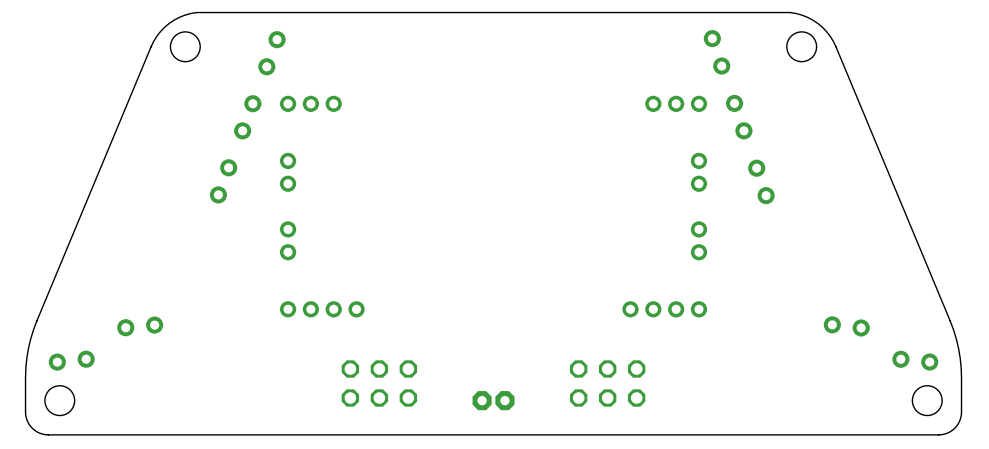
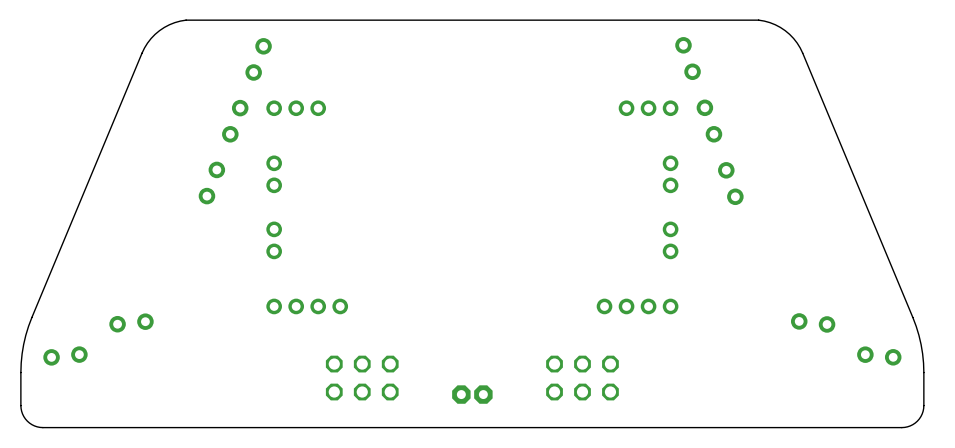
round board edge: [170, 31, 201, 63] -> none
round board edge: [786, 31, 818, 63] -> none
round board edge: [44, 385, 76, 416] -> none
round board edge: [911, 385, 943, 416] -> none

